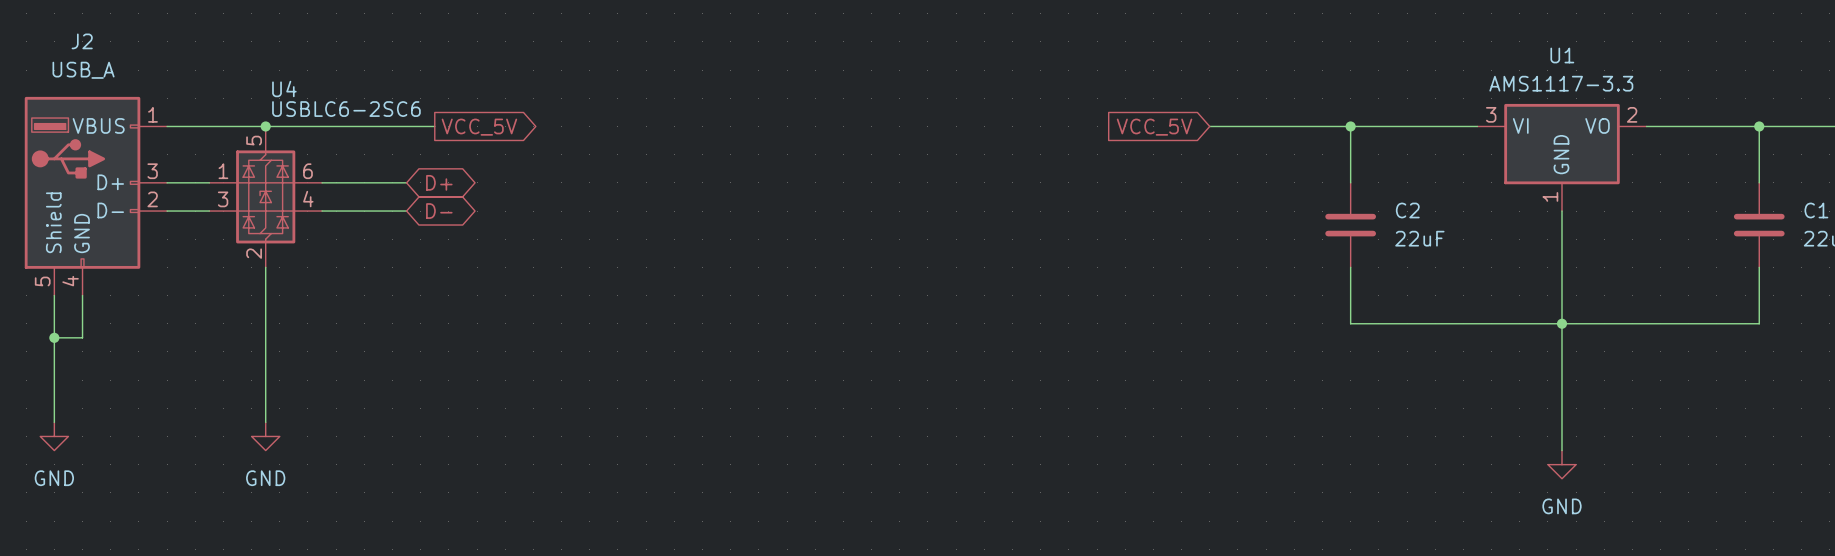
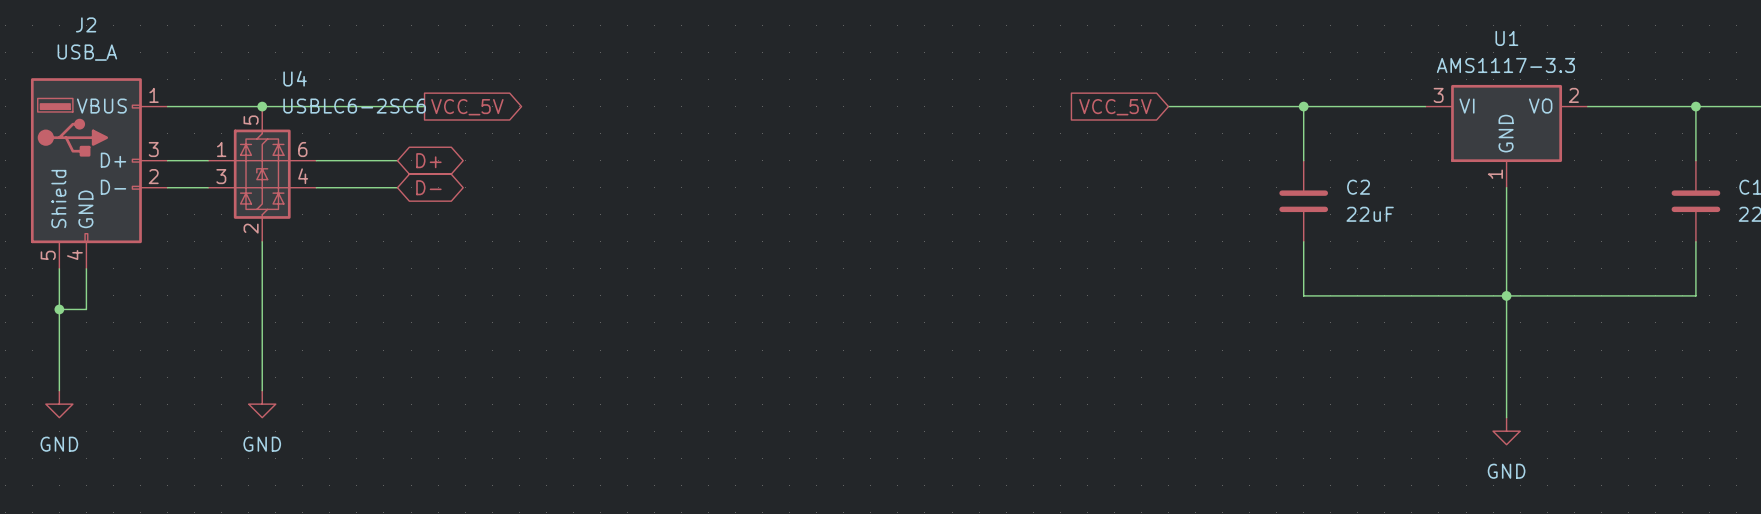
U4 name position: U4 (284, 88) -> U4 (295, 78)
U4 value position: USBLC6-2SC6 (346, 109) -> USBLC6-2SC6 (354, 106)

